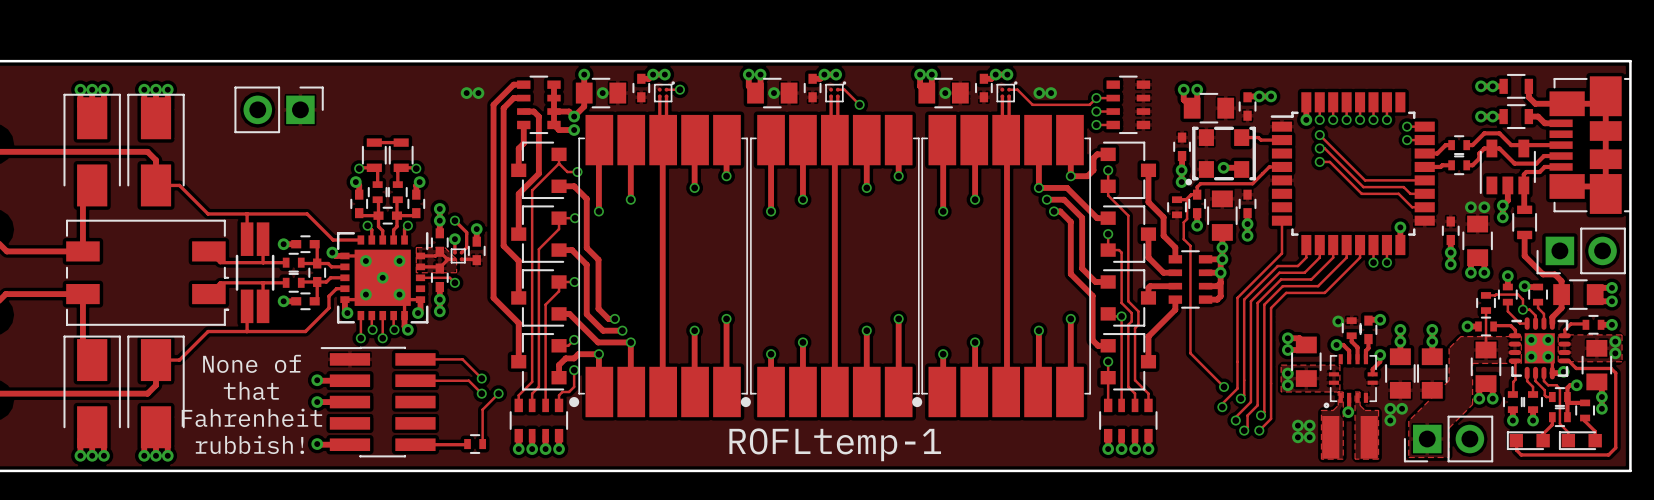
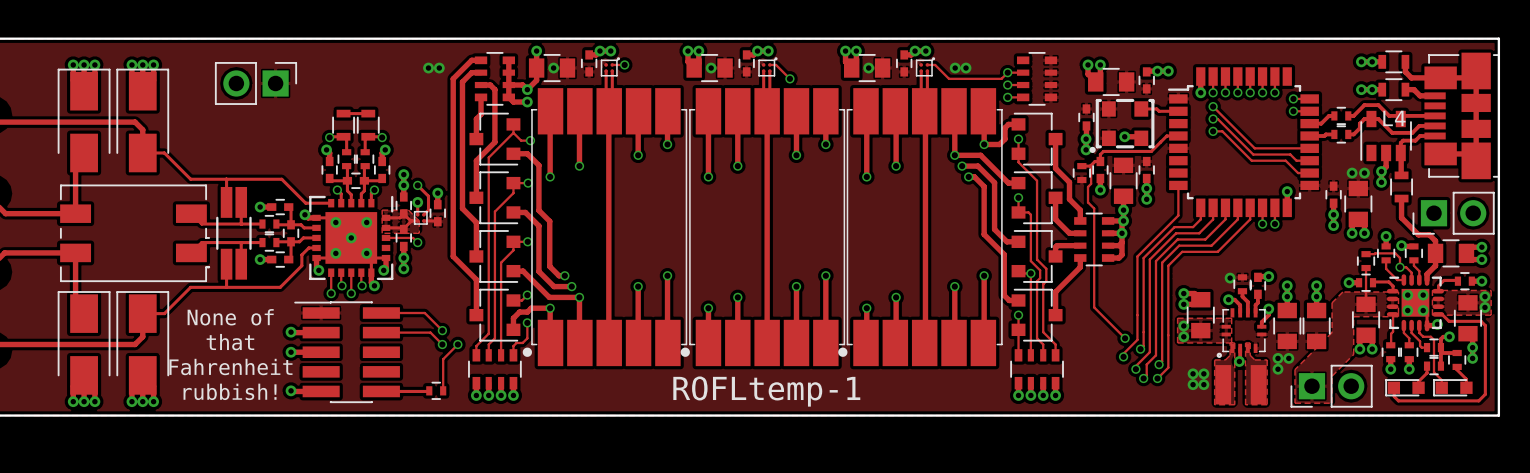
L4 name: none -> L4 (1394, 118)

